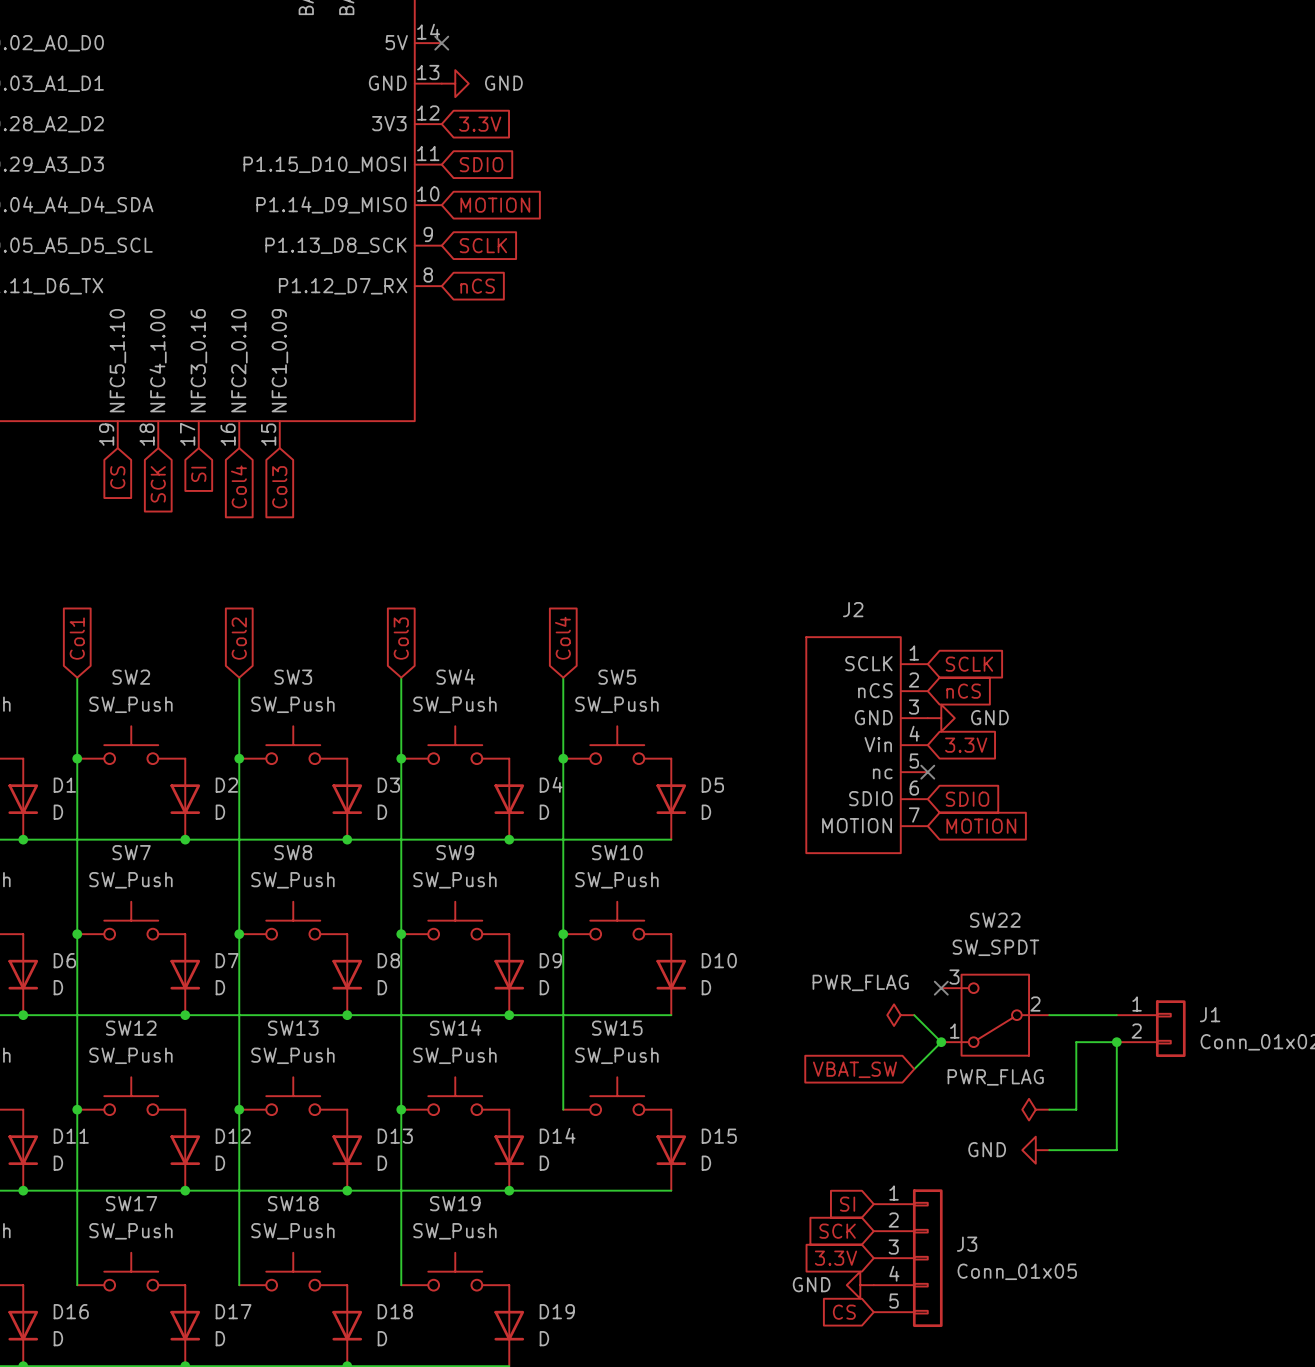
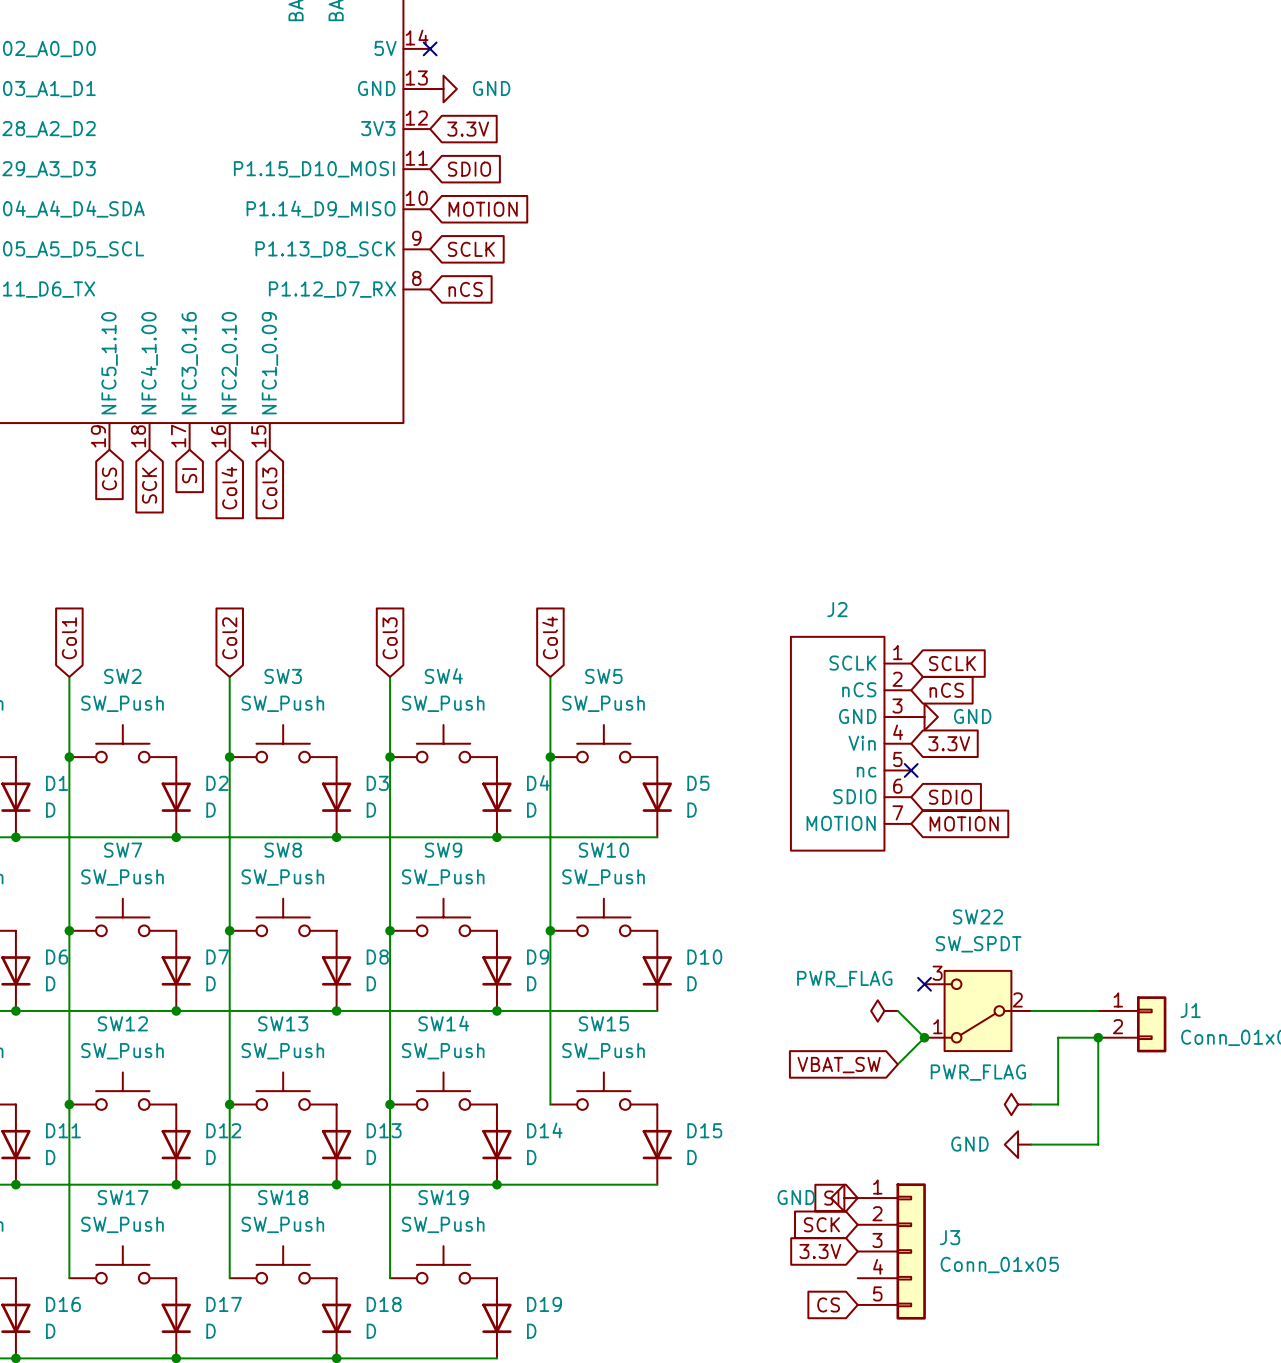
power symbol position: GND (860, 1285) -> GND (844, 1198)

